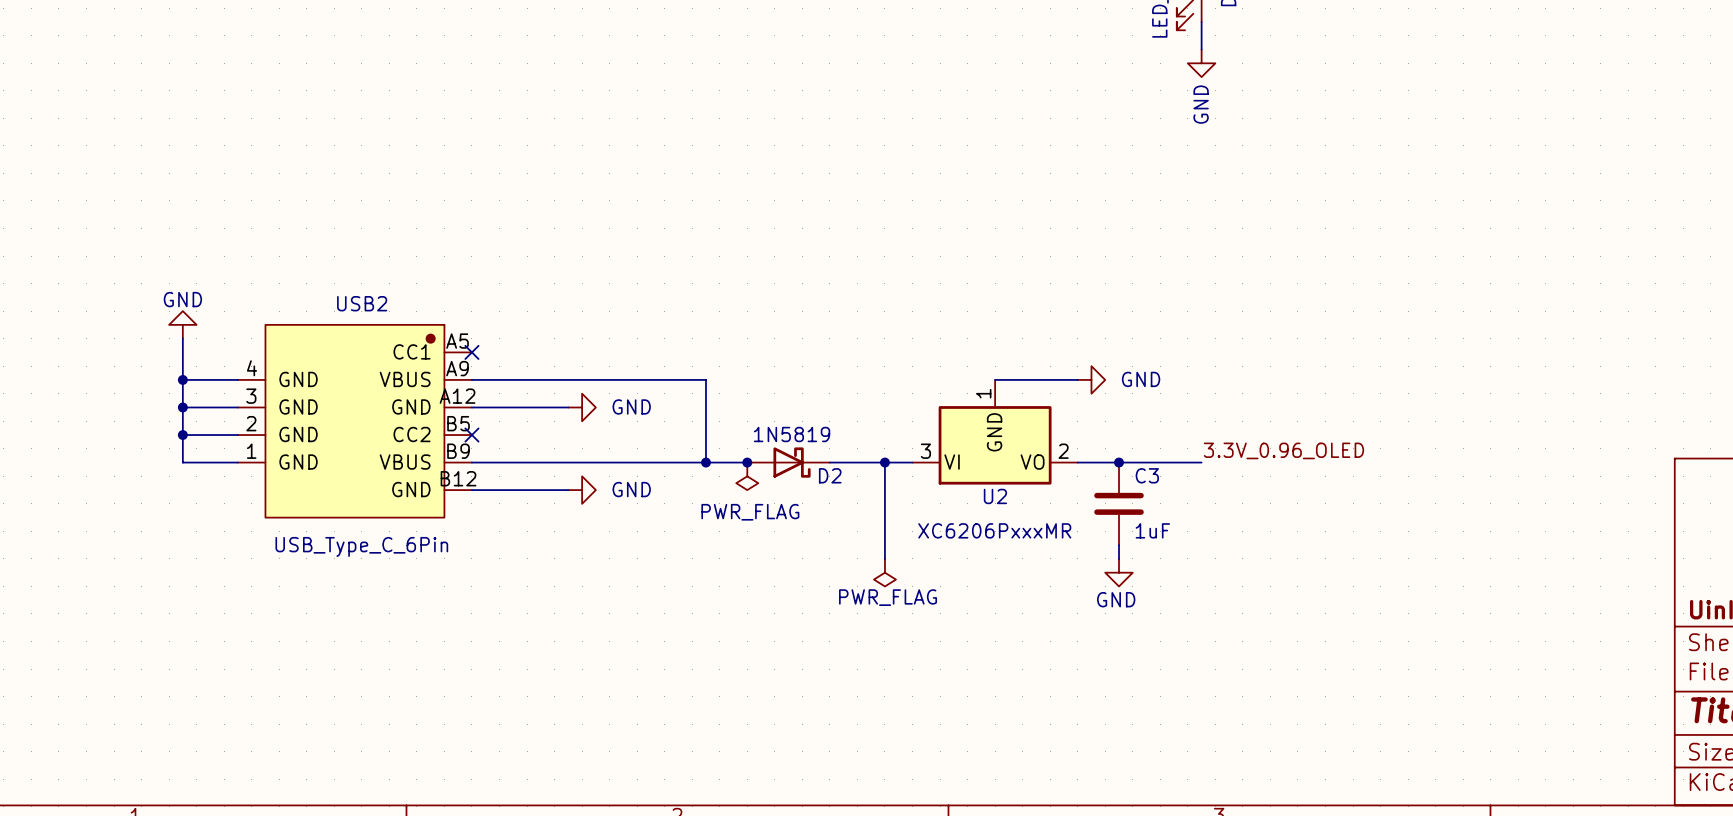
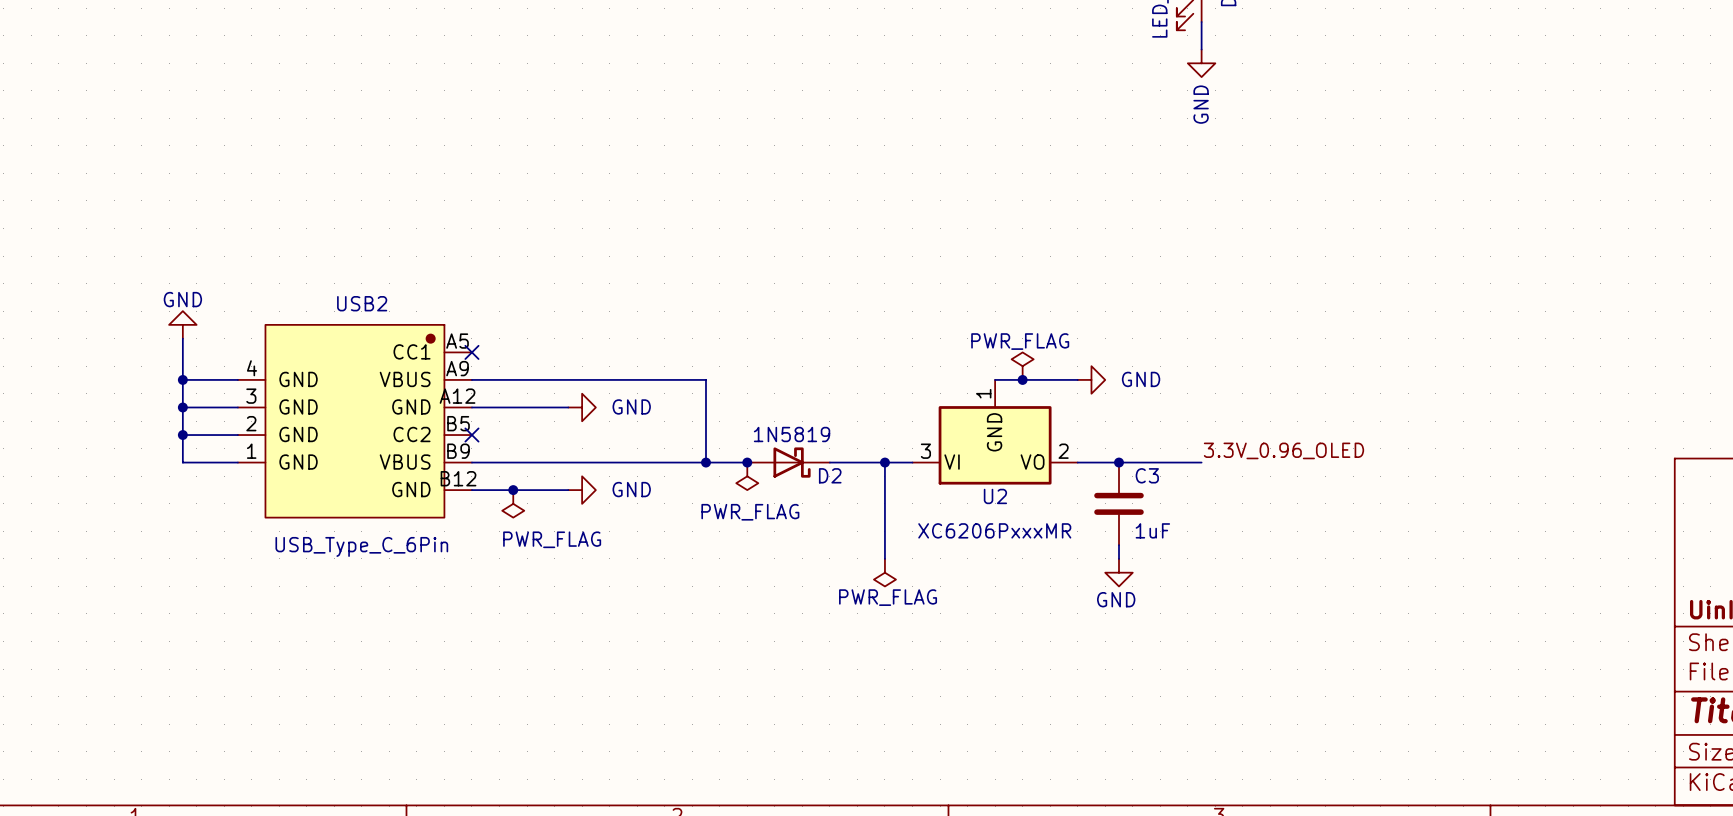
power symbol: none -> PWR_FLAG (1022, 366)
junction: none -> (1022, 379)
junction: none -> (513, 490)
power symbol: none -> PWR_FLAG (513, 503)

